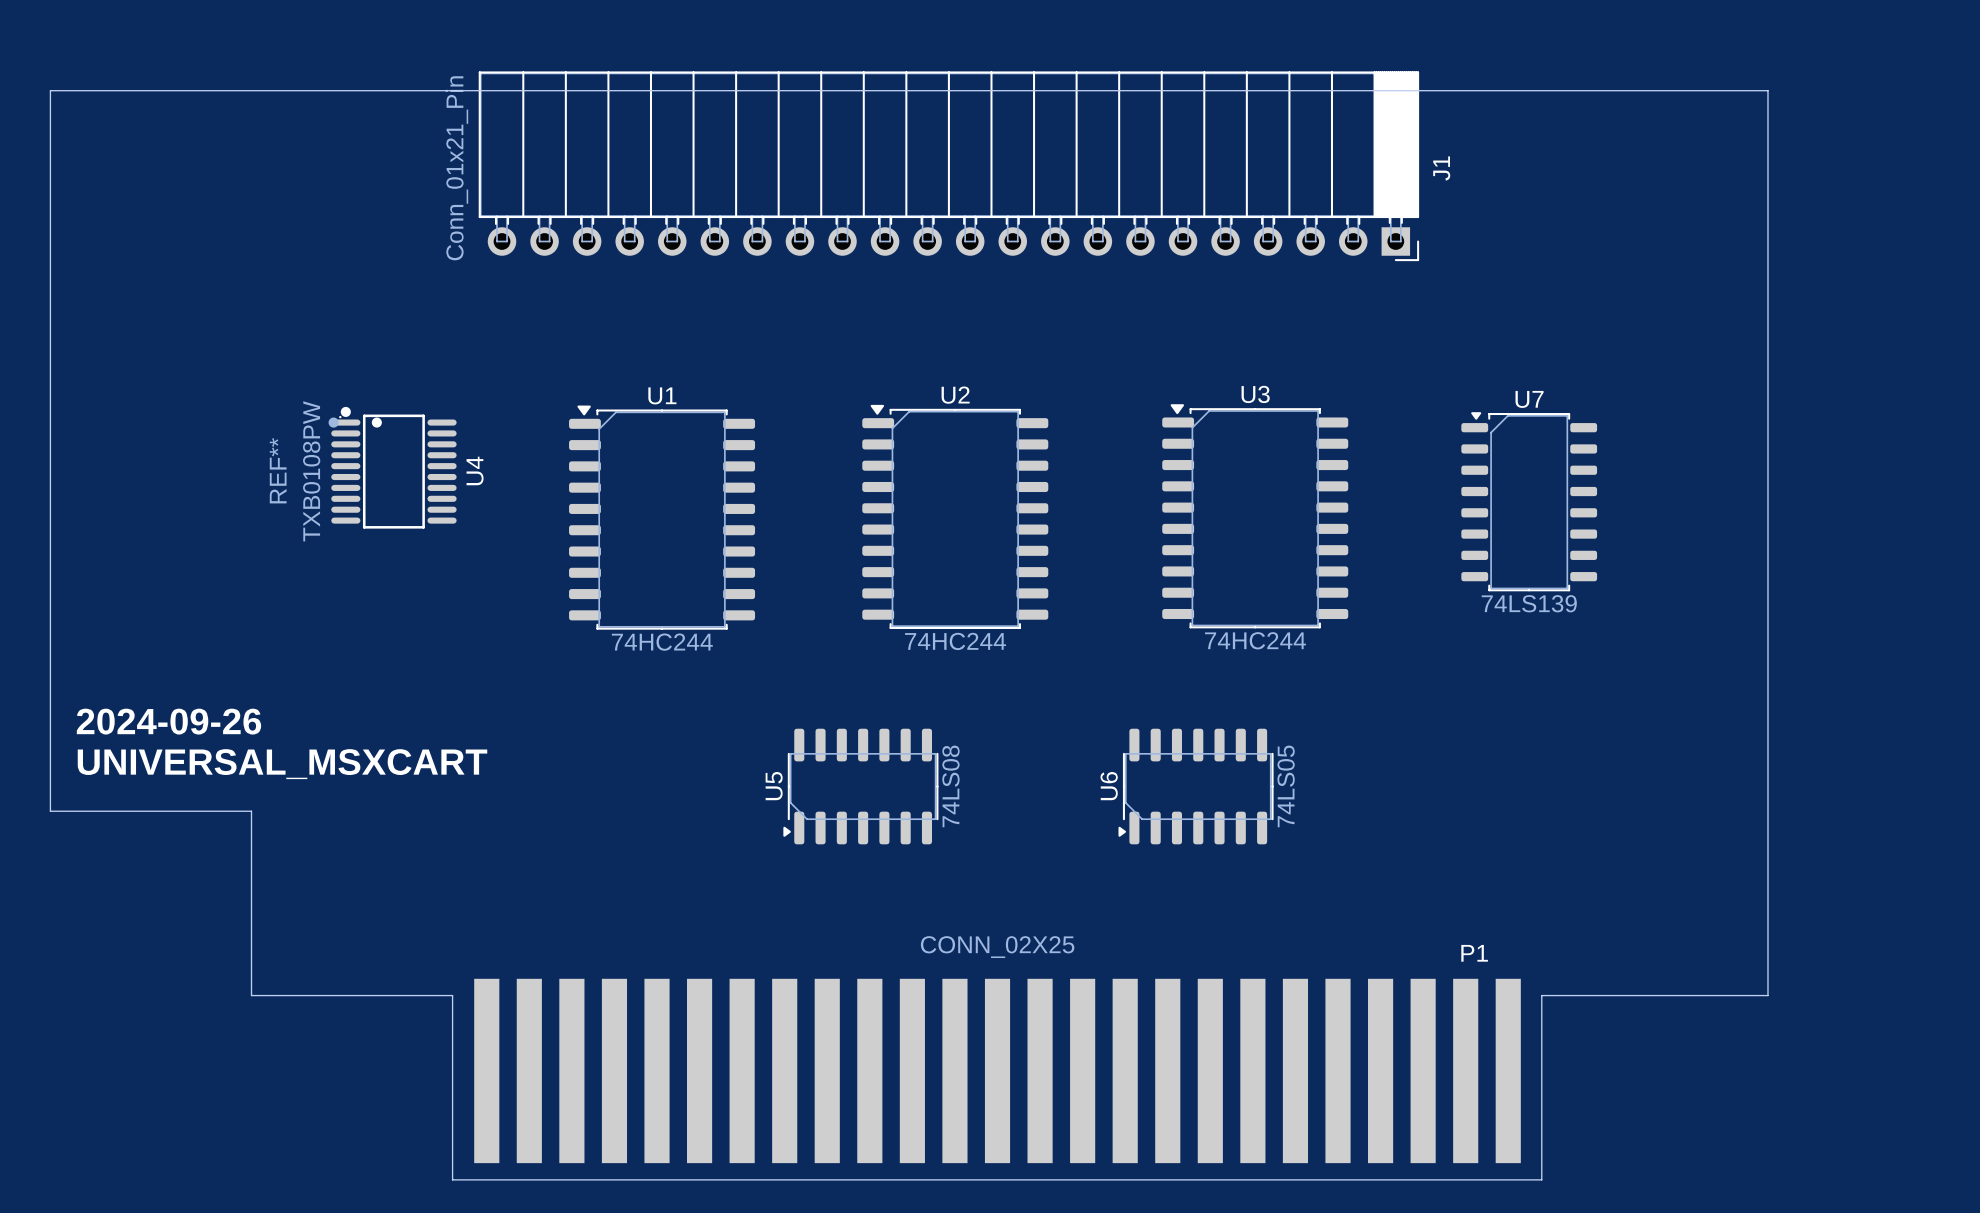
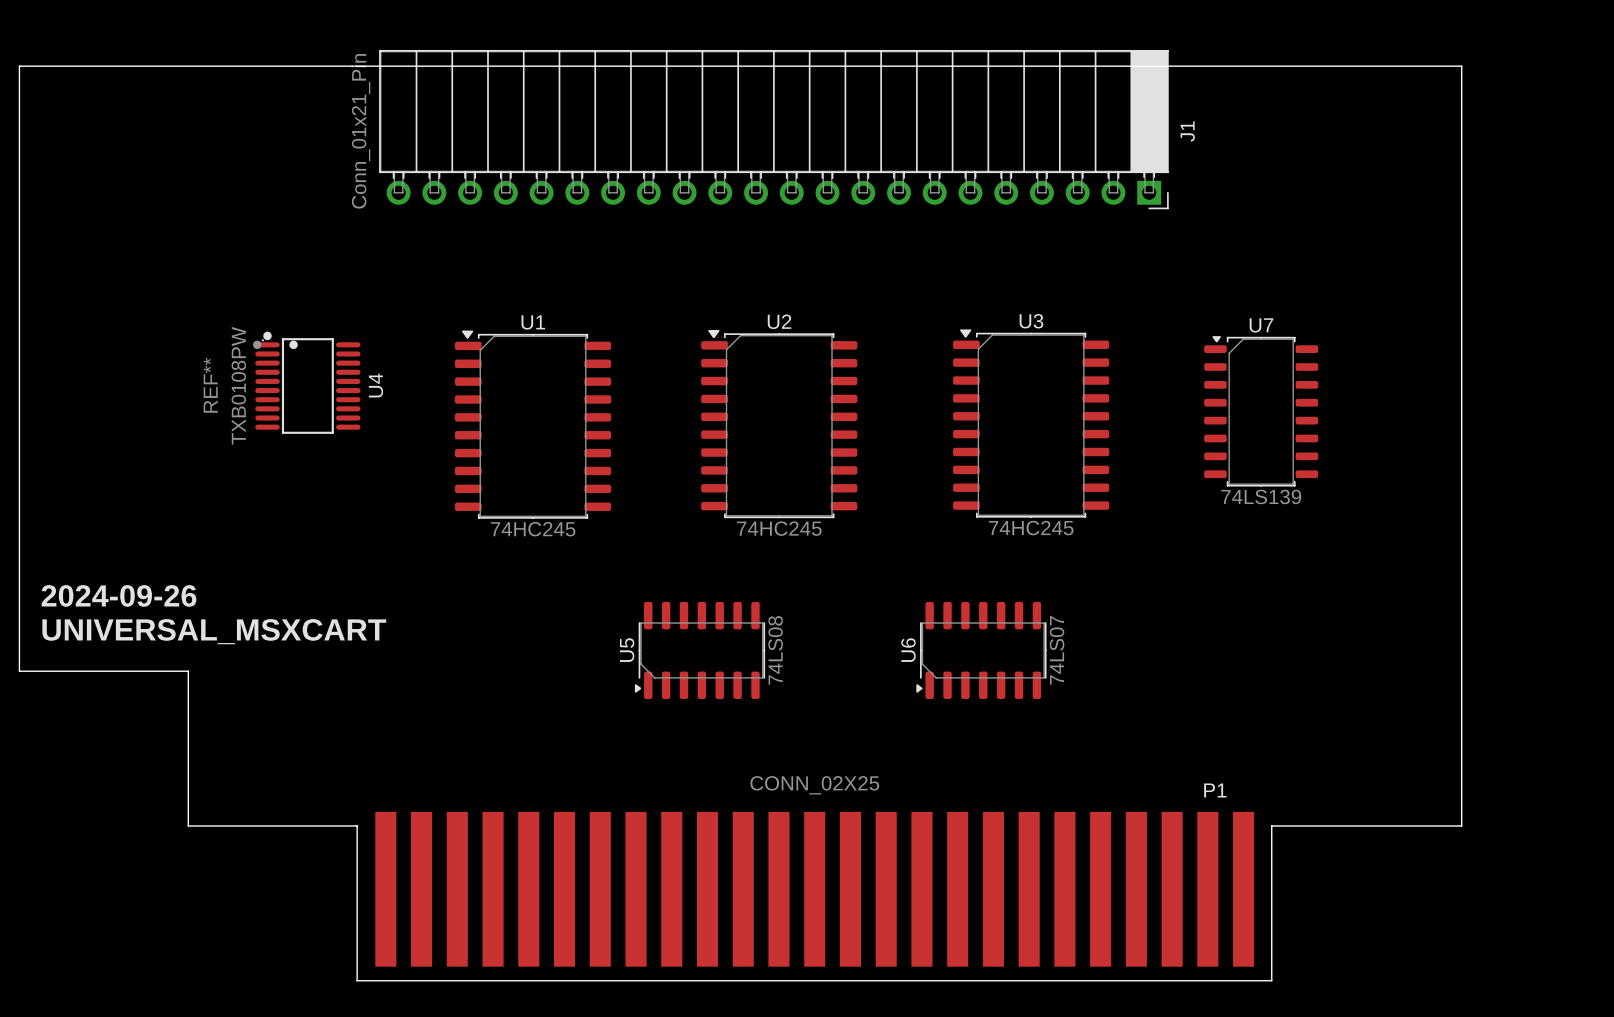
U3 value: 74HC244 (1255, 640) -> 74HC245 (1031, 528)
U2 value: 74HC244 (955, 641) -> 74HC245 (779, 528)
U1 value: 74HC244 (662, 642) -> 74HC245 (533, 529)
U6 value: 74LS05 (1286, 786) -> 74LS07 (1057, 650)

